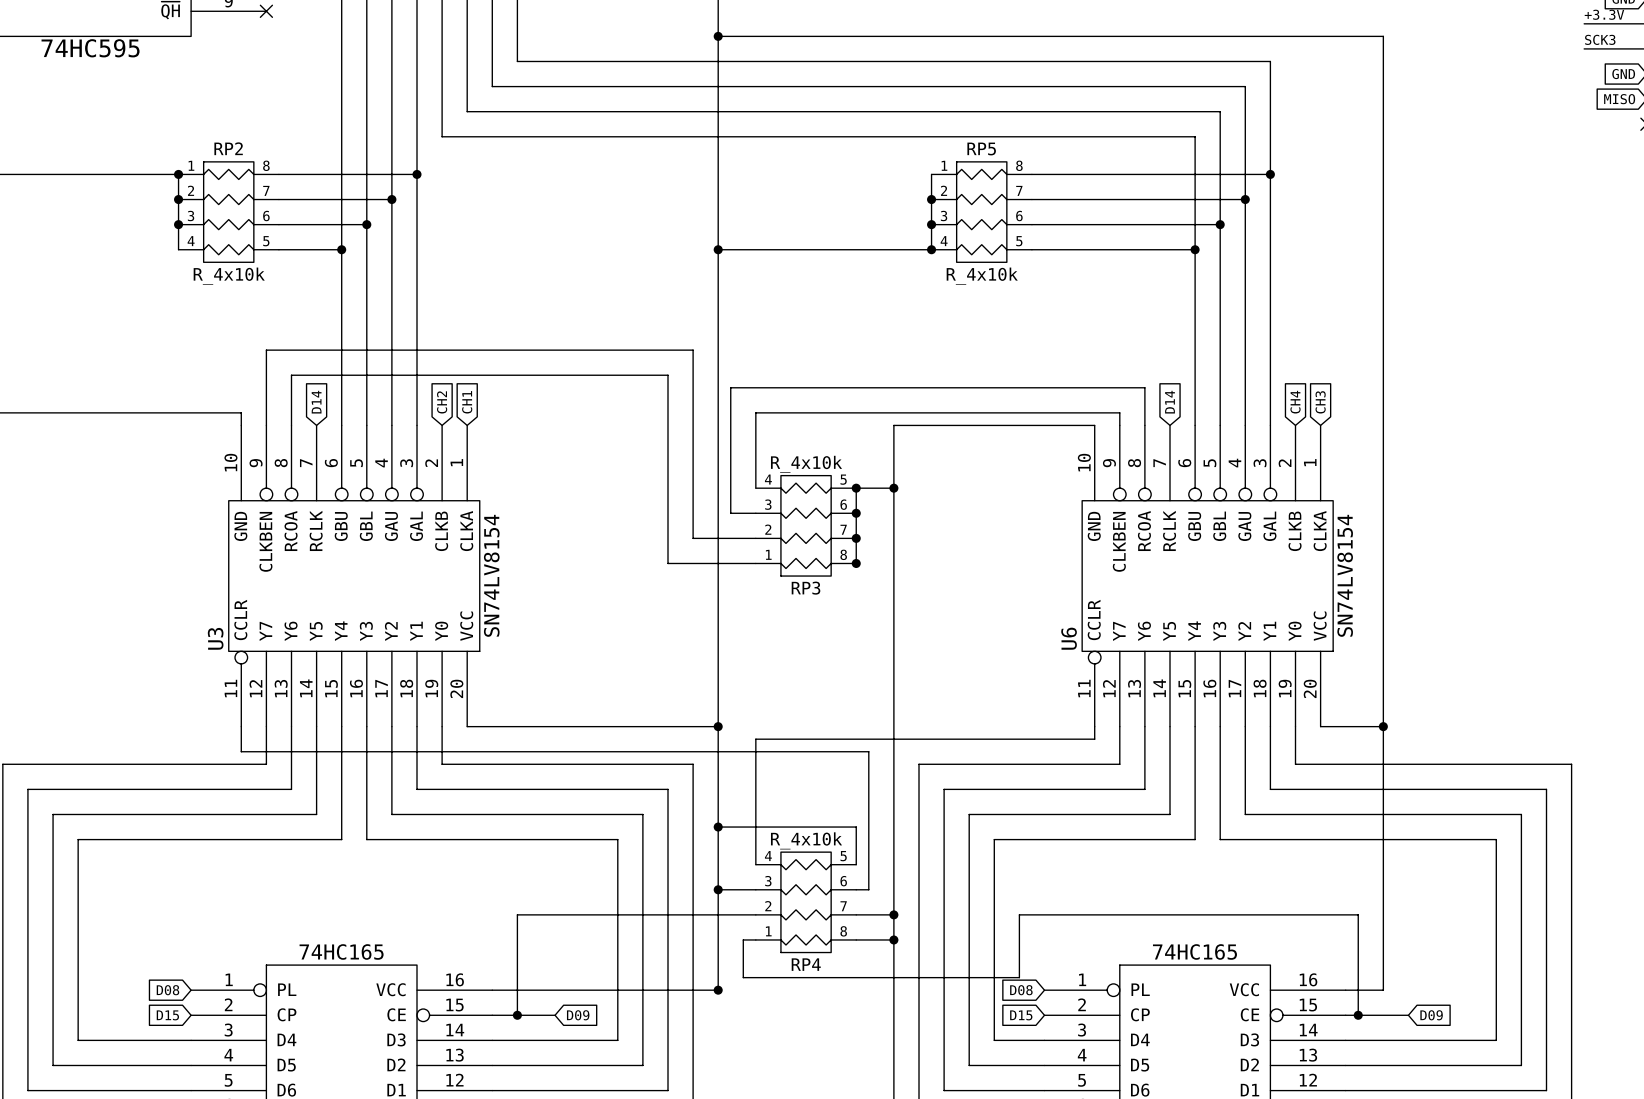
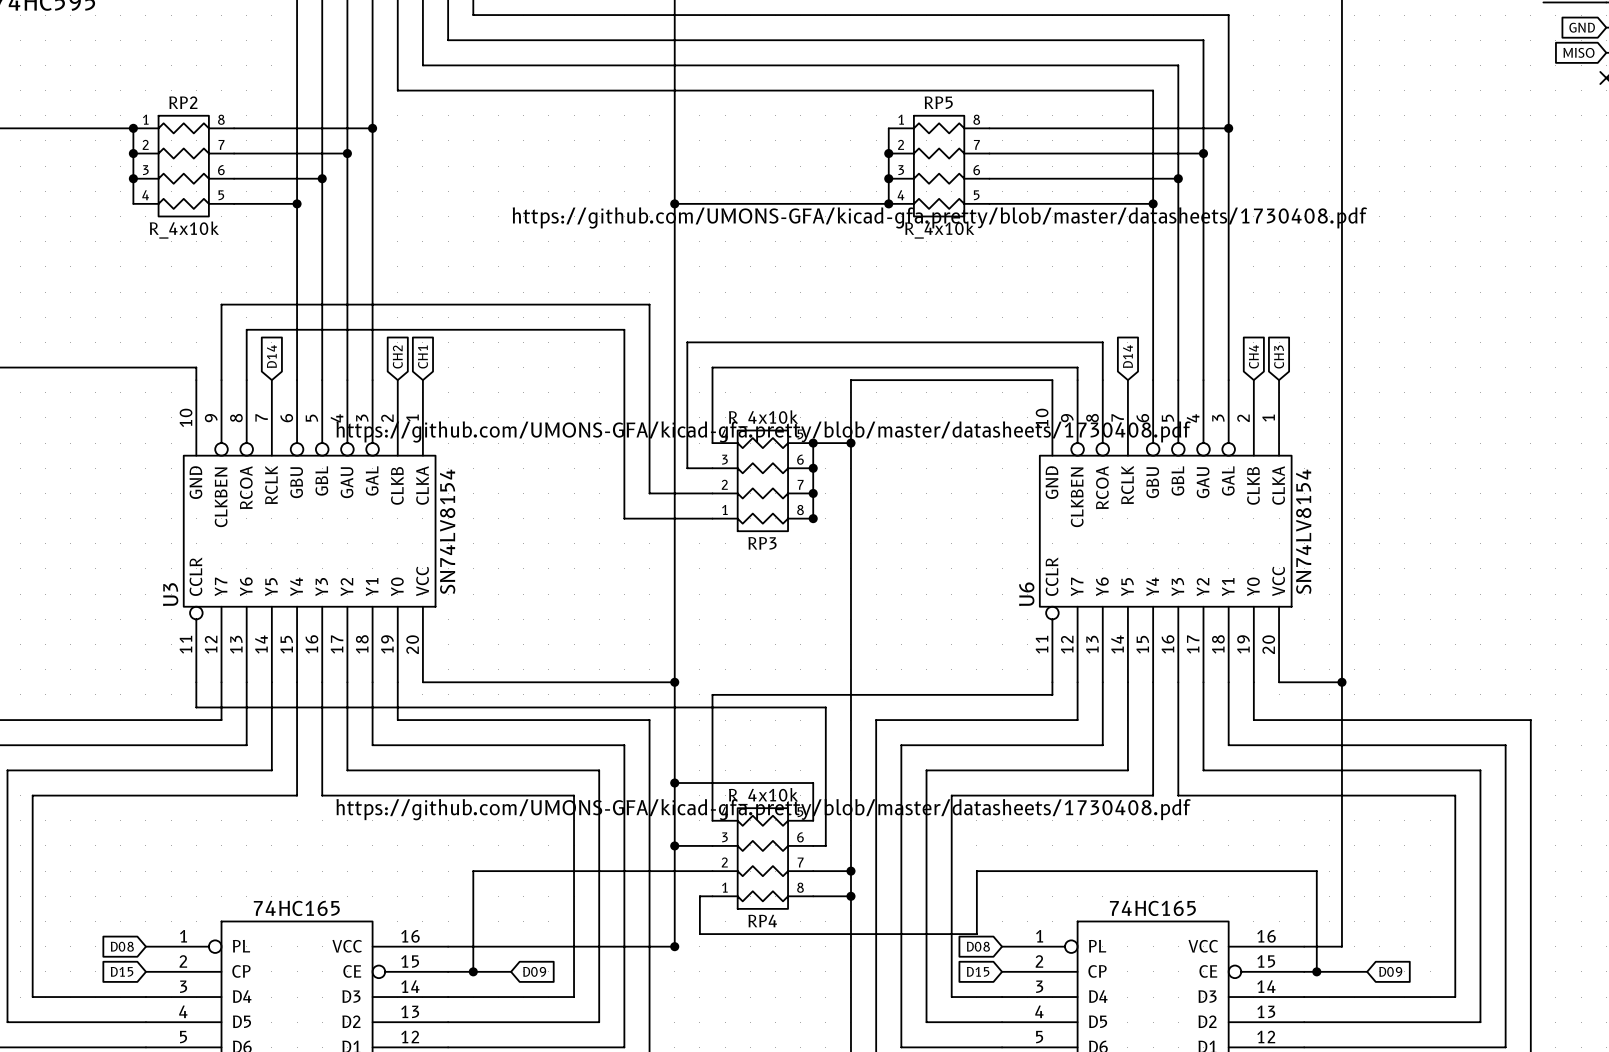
RP5 text: none -> https://github.com/UMONS-GFA/kicad-gfa.pretty/blob/master/datasheets/1730408.pdf (939, 217)
RP3 text: none -> https://github.com/UMONS-GFA/kicad-gfa.pretty/blob/master/datasheets/1730408.pdf (763, 432)
RP4 text: none -> https://github.com/UMONS-GFA/kicad-gfa.pretty/blob/master/datasheets/1730408.pdf (763, 809)

